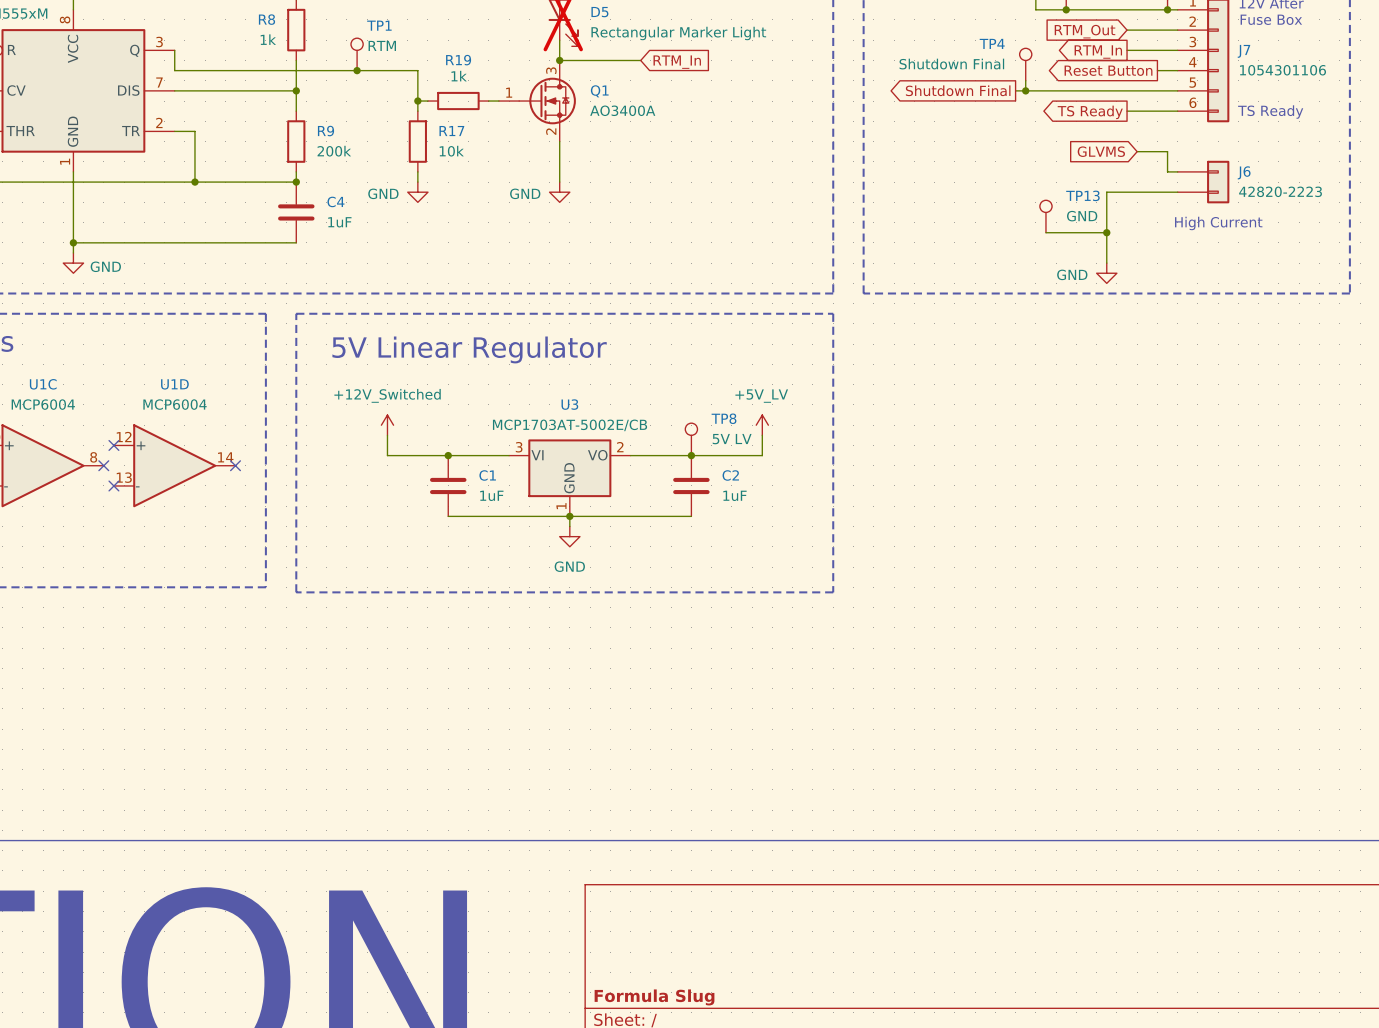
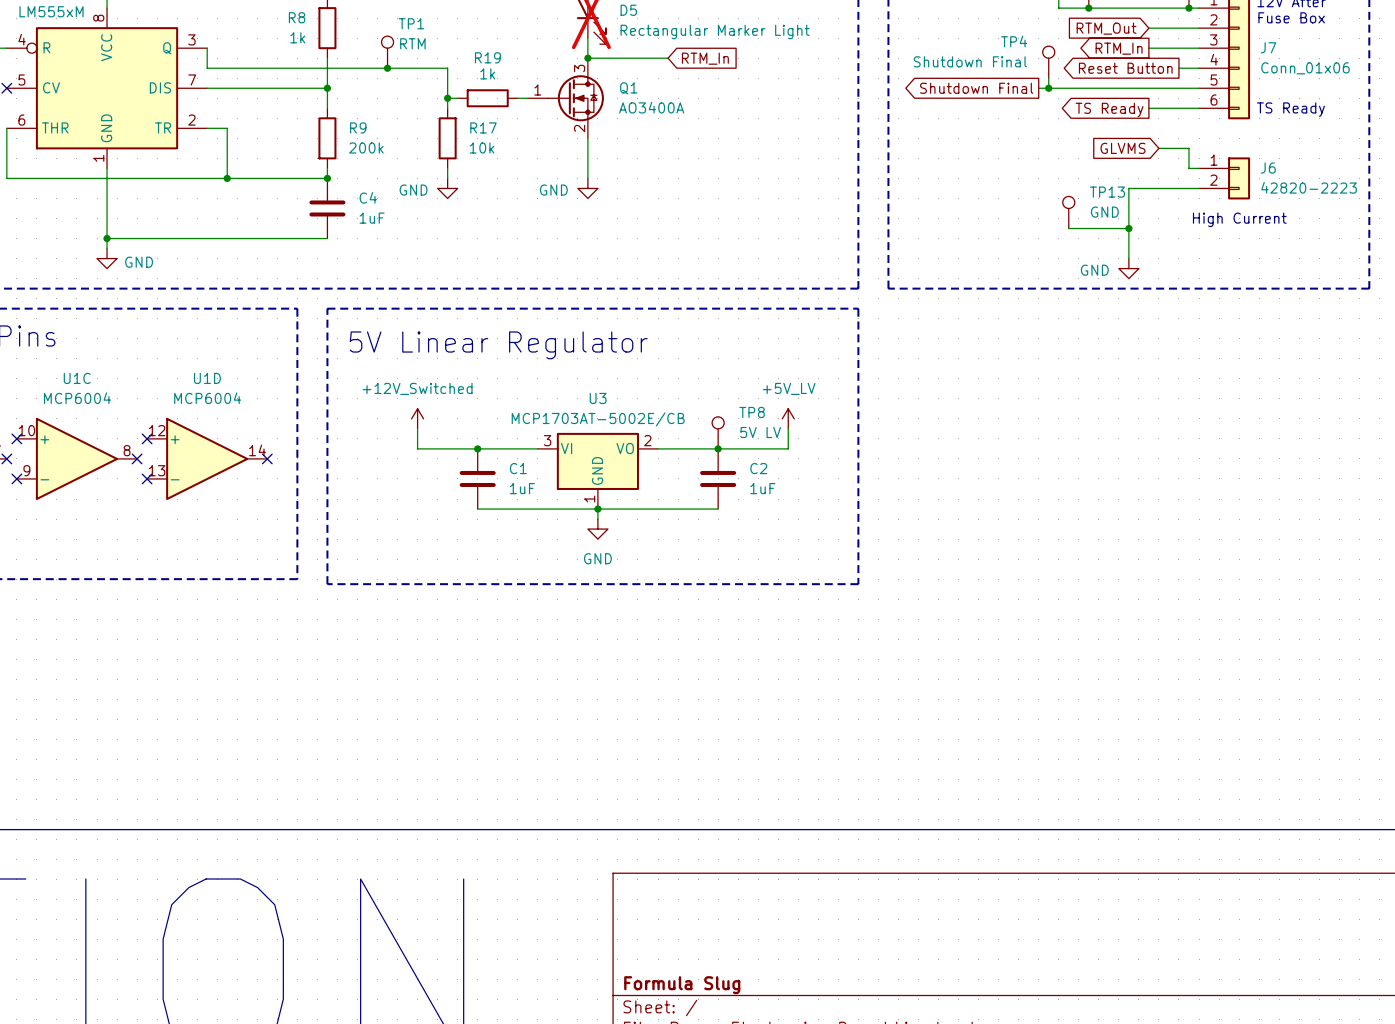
J7 value: 1054301106 (1282, 70) -> Conn_01x06 (1305, 68)
J6 pin number: none -> 1 (1214, 160)
J6 pin number: none -> 2 (1213, 180)

